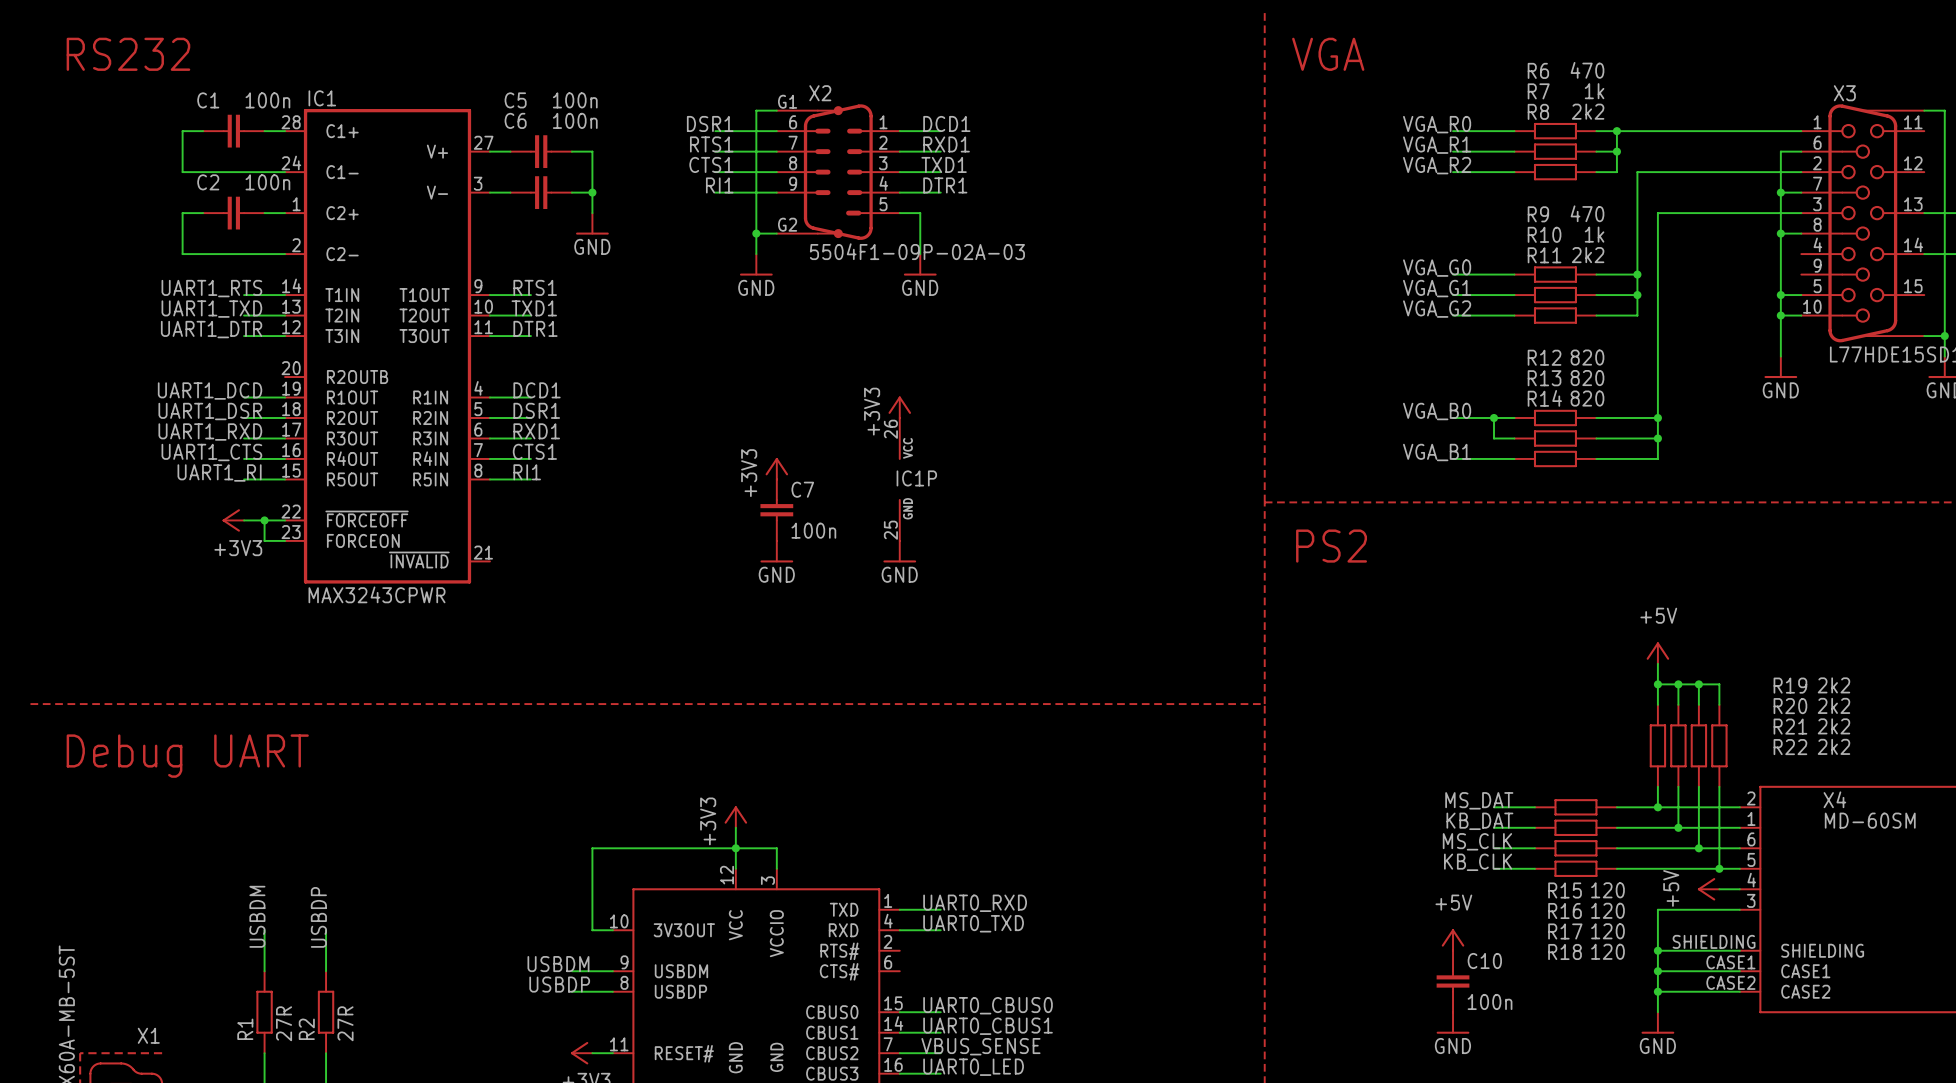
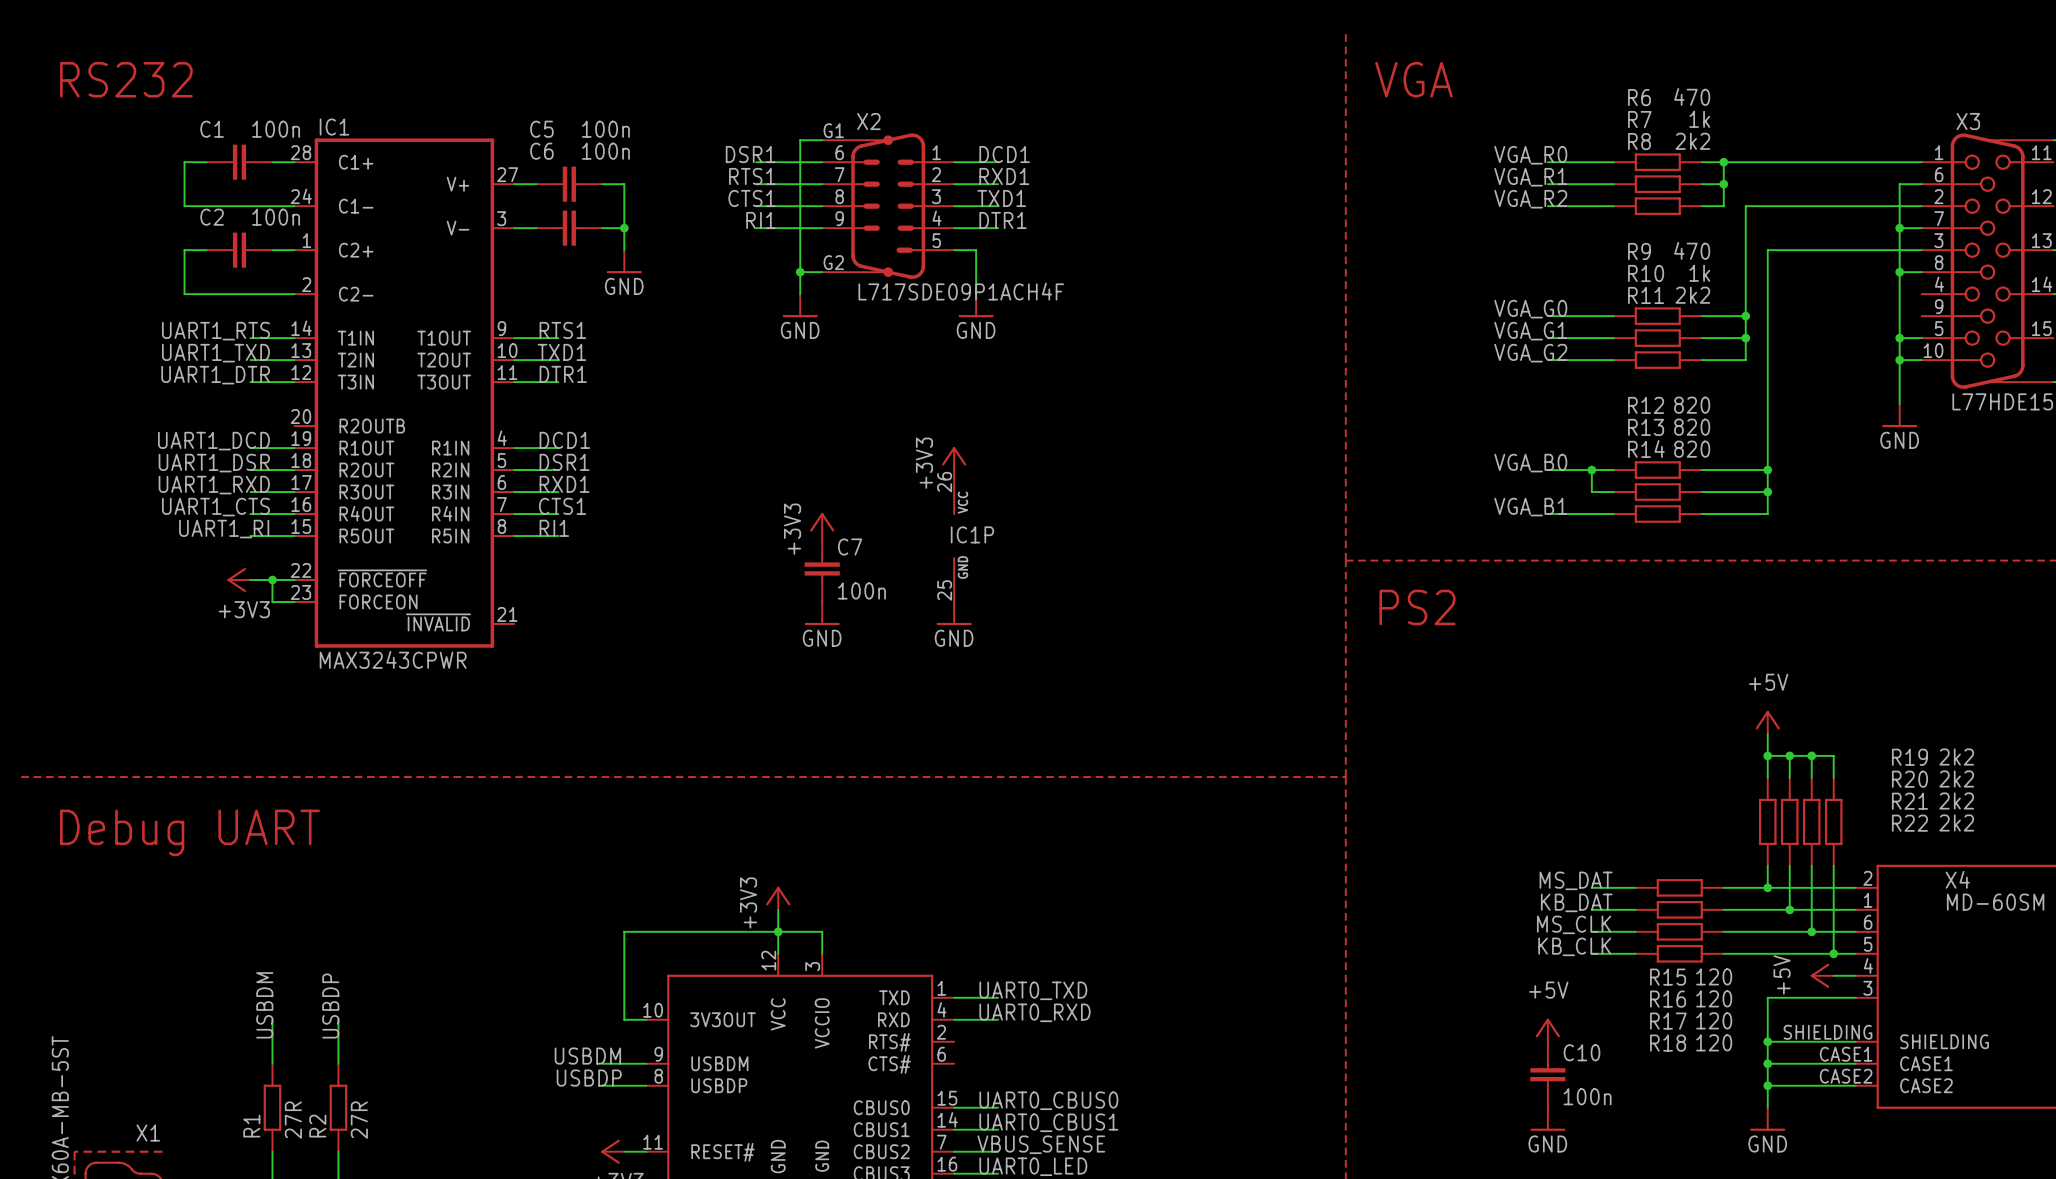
X2 value: 5504F1-09P-02A-03 (917, 251) -> L717SDE09P1ACH4F (961, 291)
label: UART0_RXD (975, 903) -> UART0_TXD (1033, 990)
label: UART0_TXD (973, 923) -> UART0_RXD (1035, 1012)

